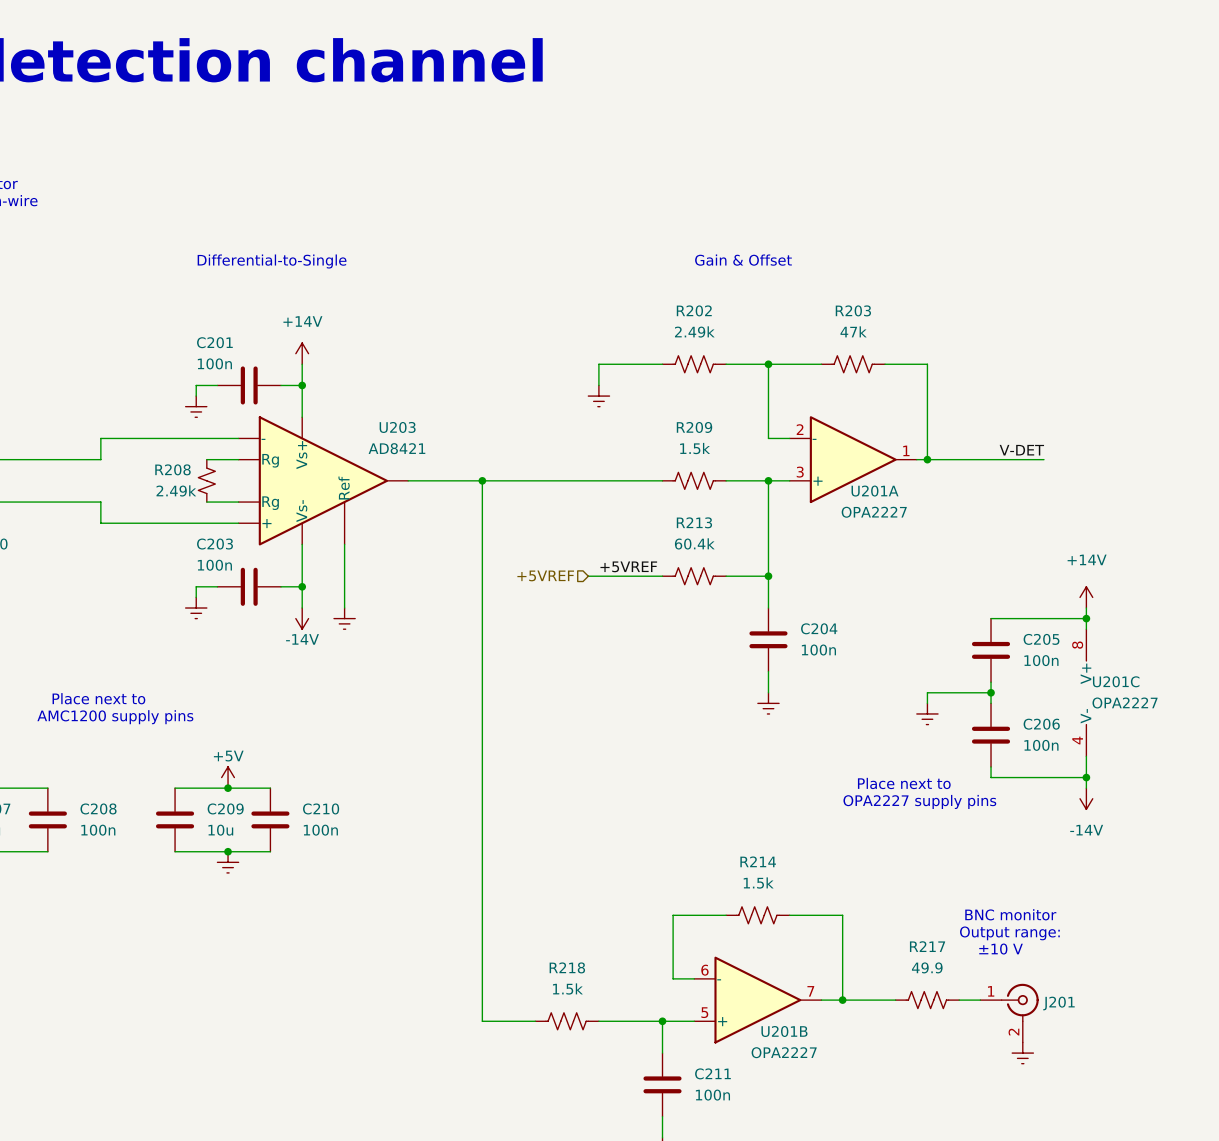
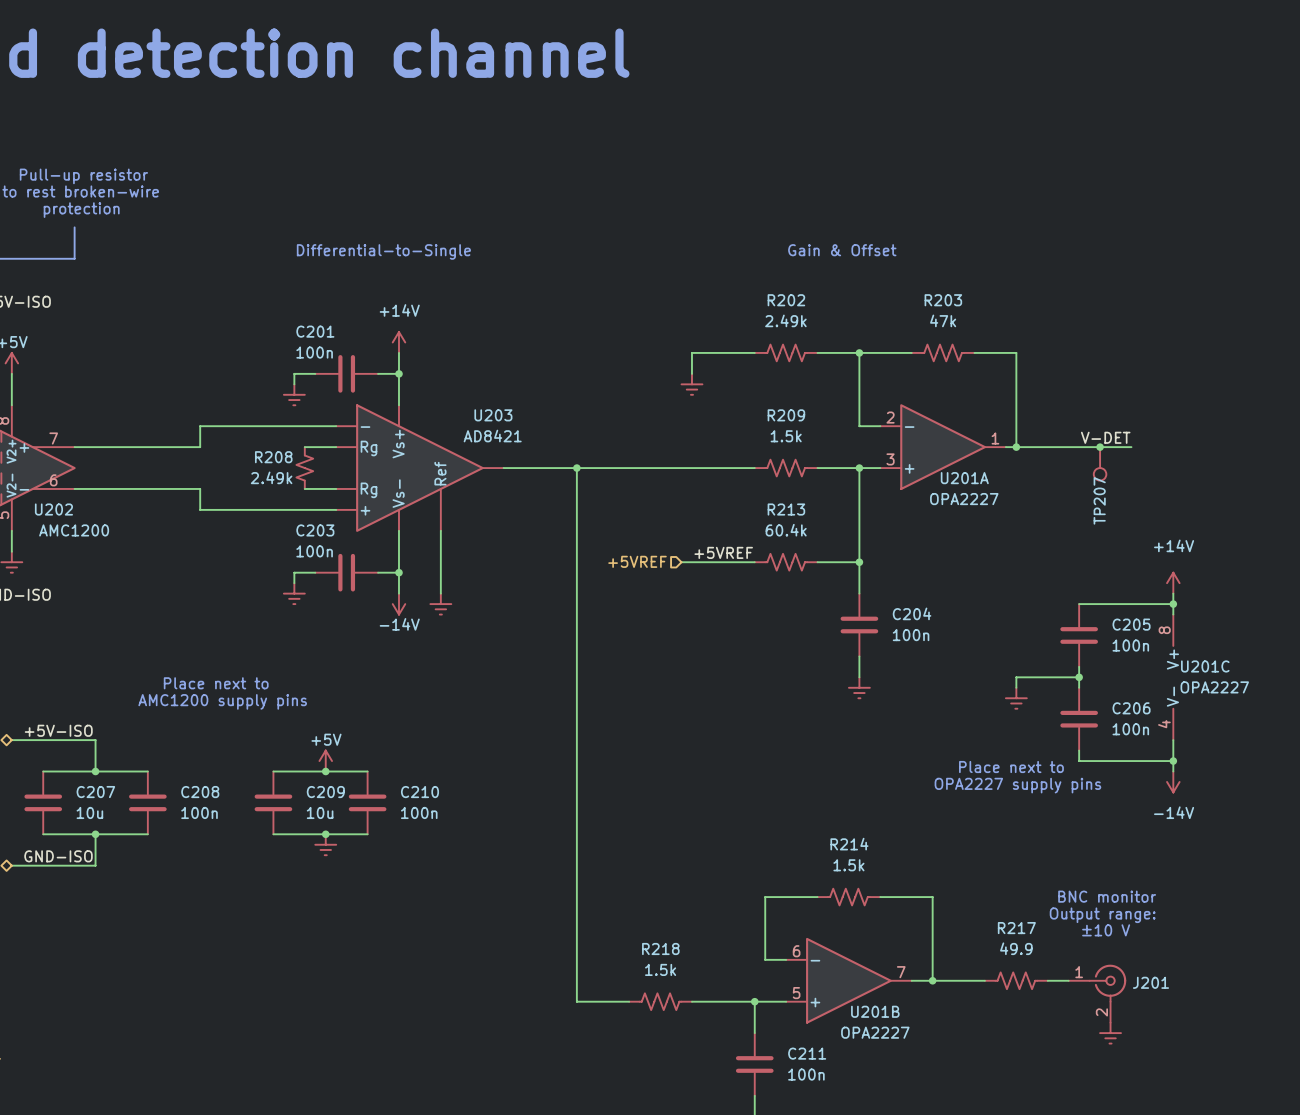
junction: none -> (1100, 447)
TP207: none -> (1100, 463)

